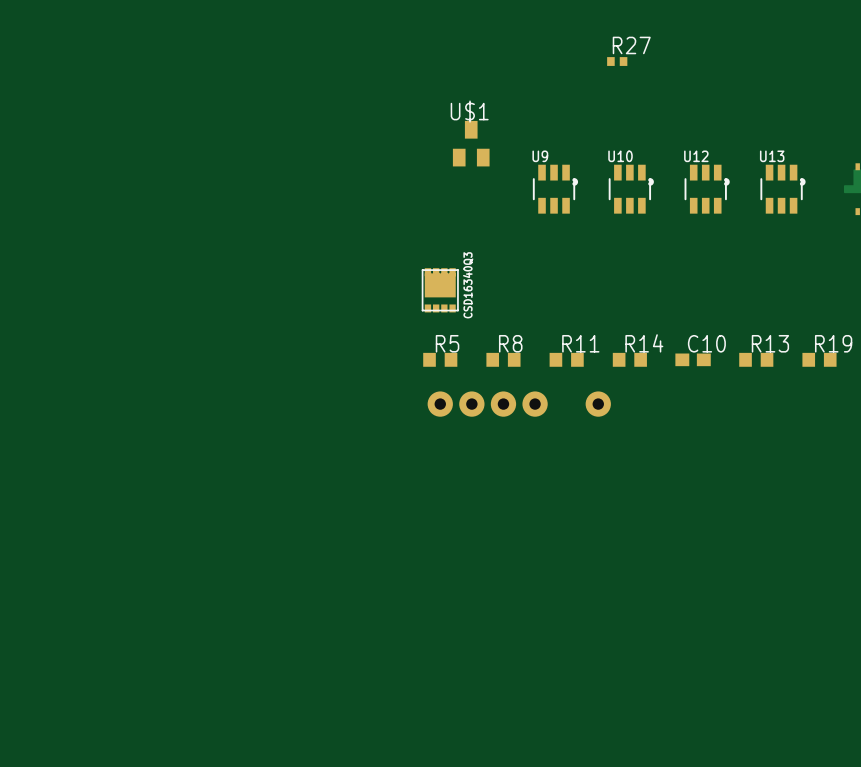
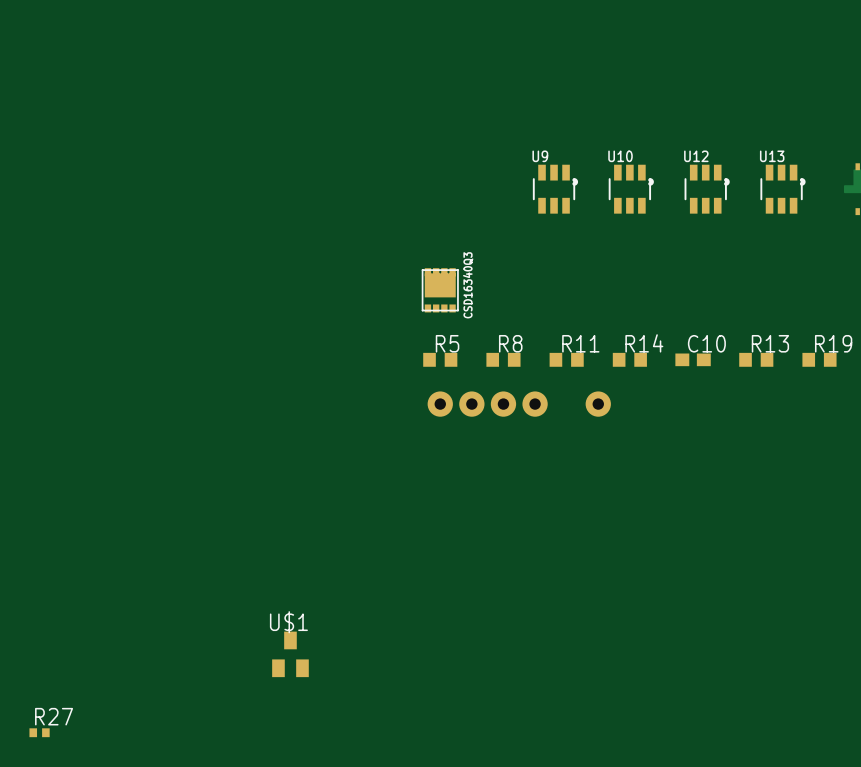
R27 position: (617, 61) -> (39, 732)
U$1 position: (471, 143) -> (290, 654)

